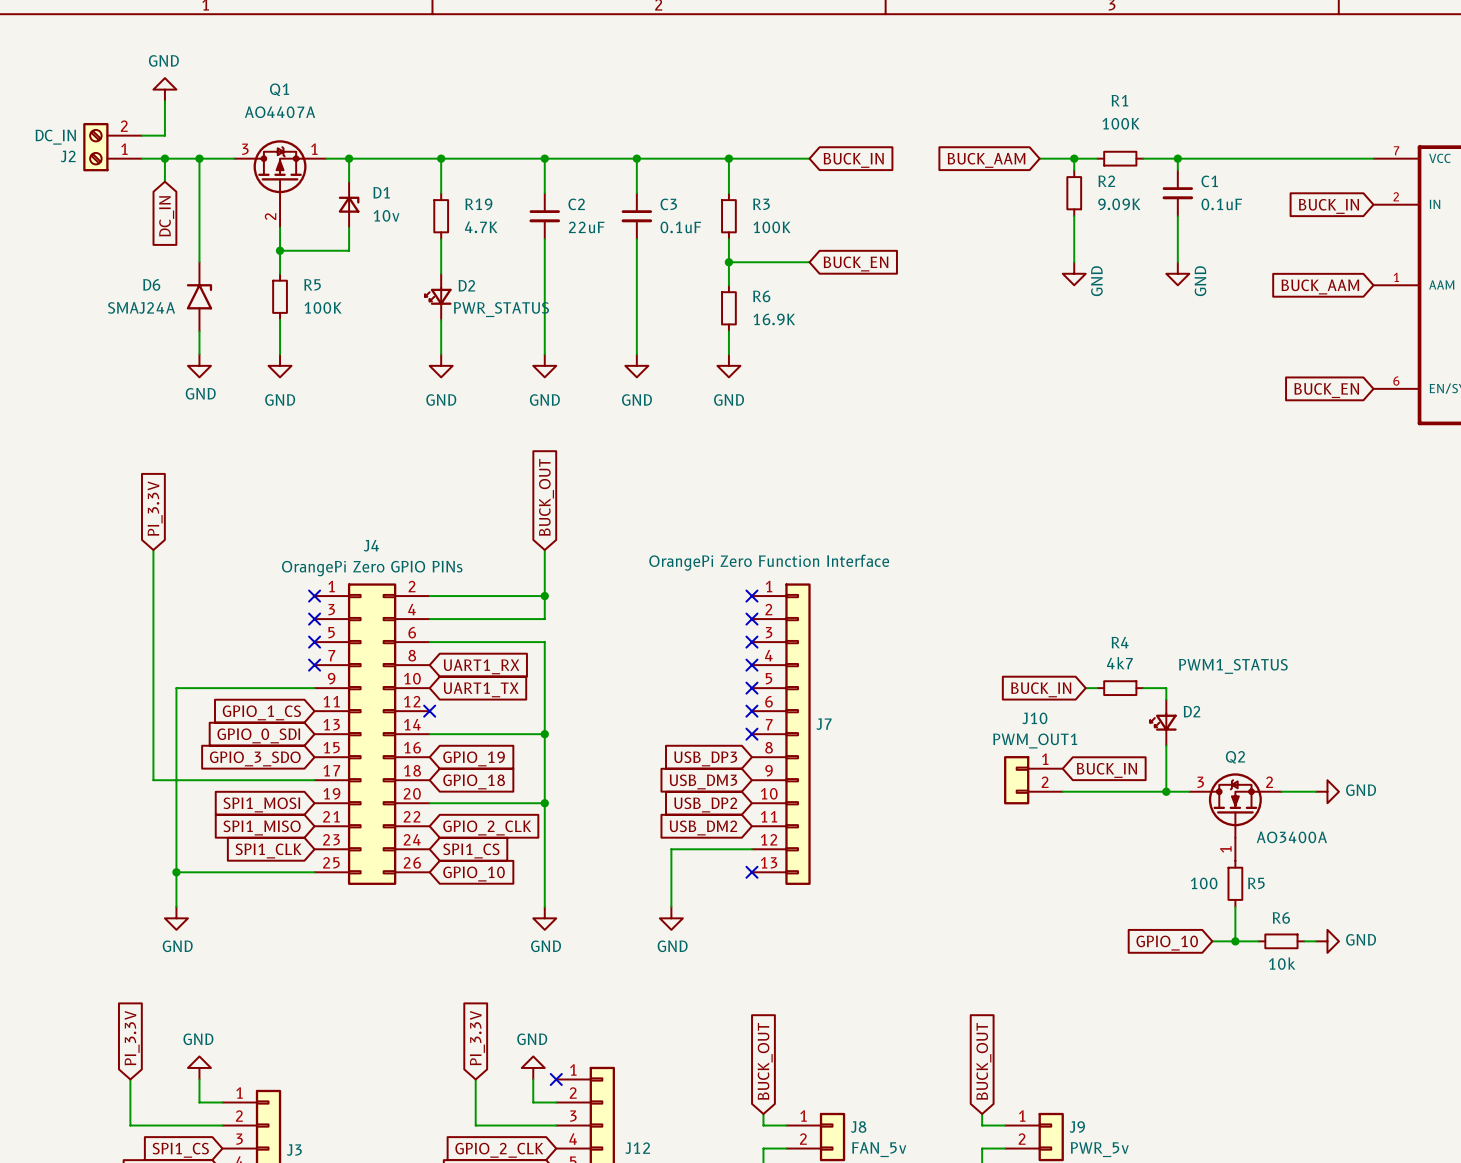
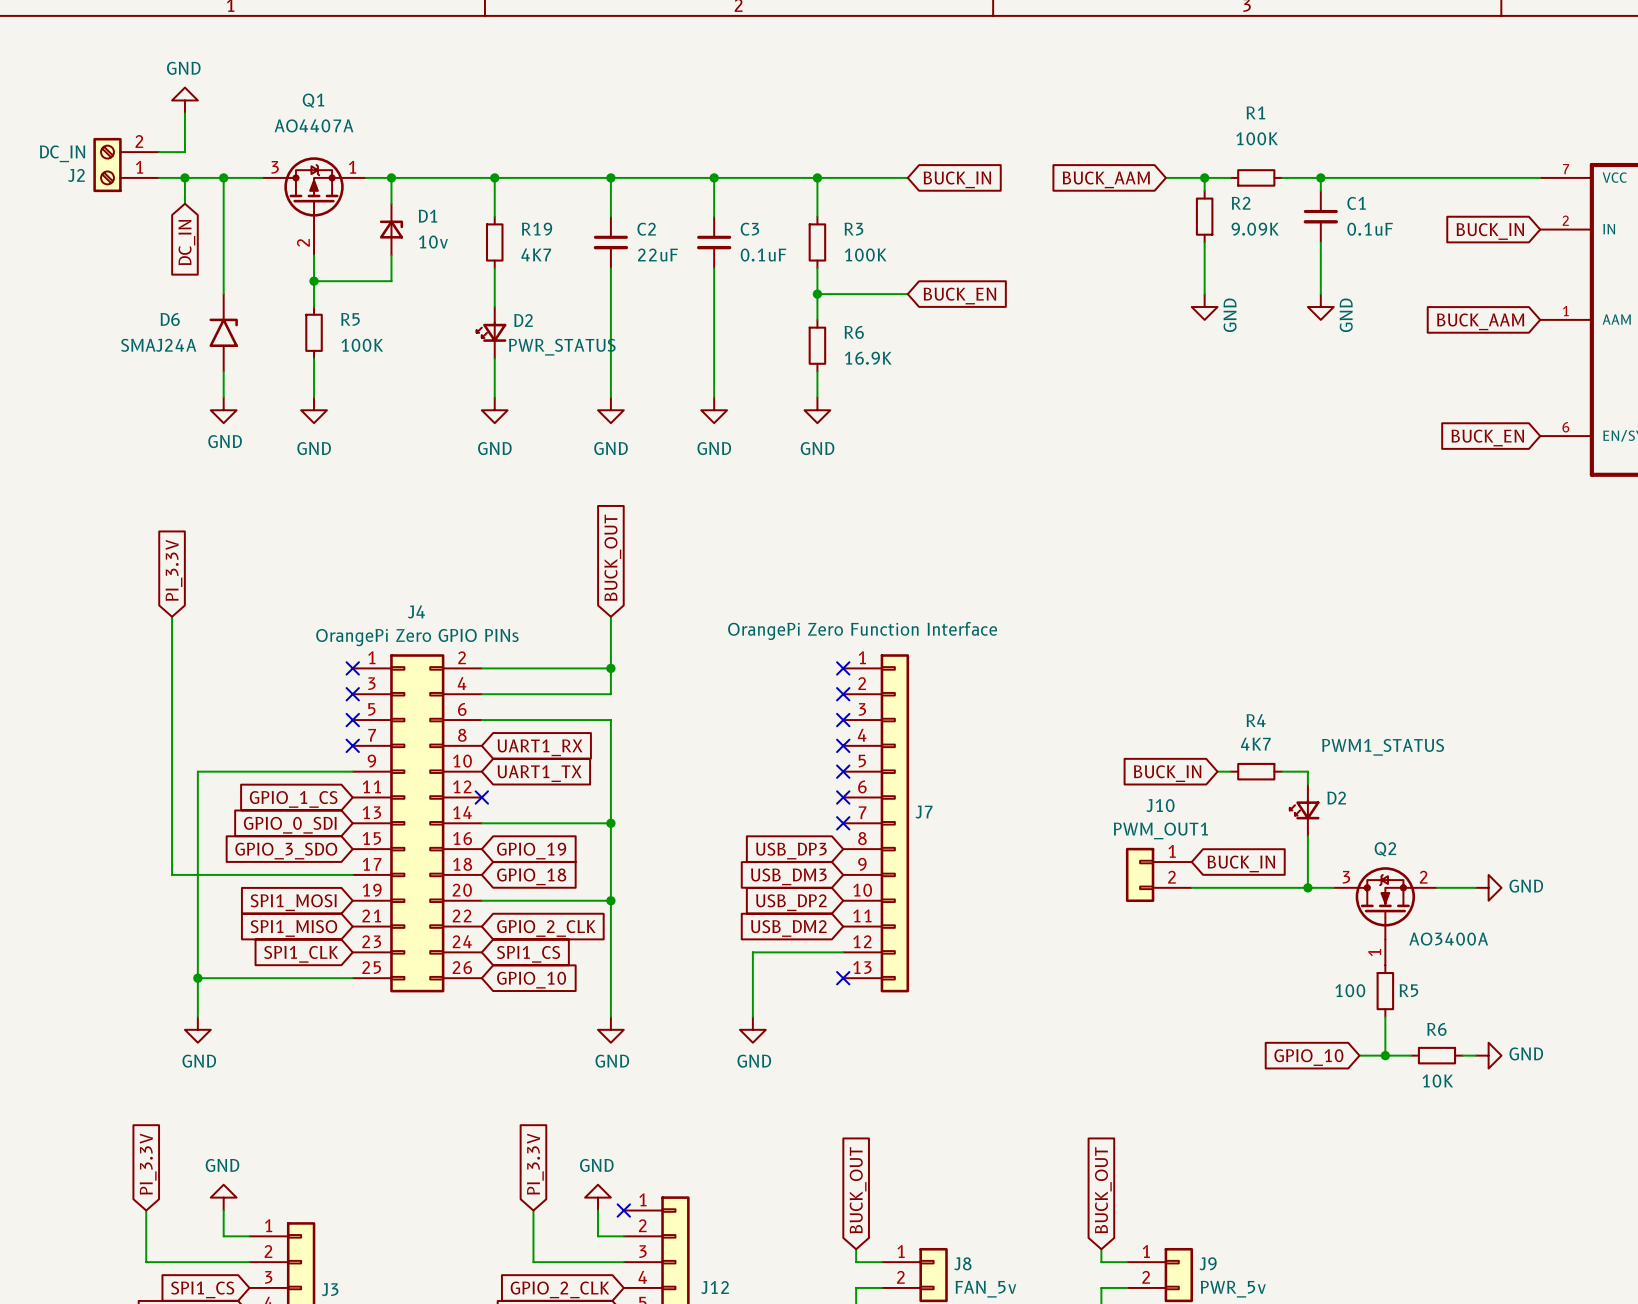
R19 value: 4.7K (481, 227) -> 4K7 (536, 254)
R4 value: 4k7 (1119, 663) -> 4K7 (1255, 744)
R6 value: 10k (1282, 963) -> 10K (1437, 1081)

